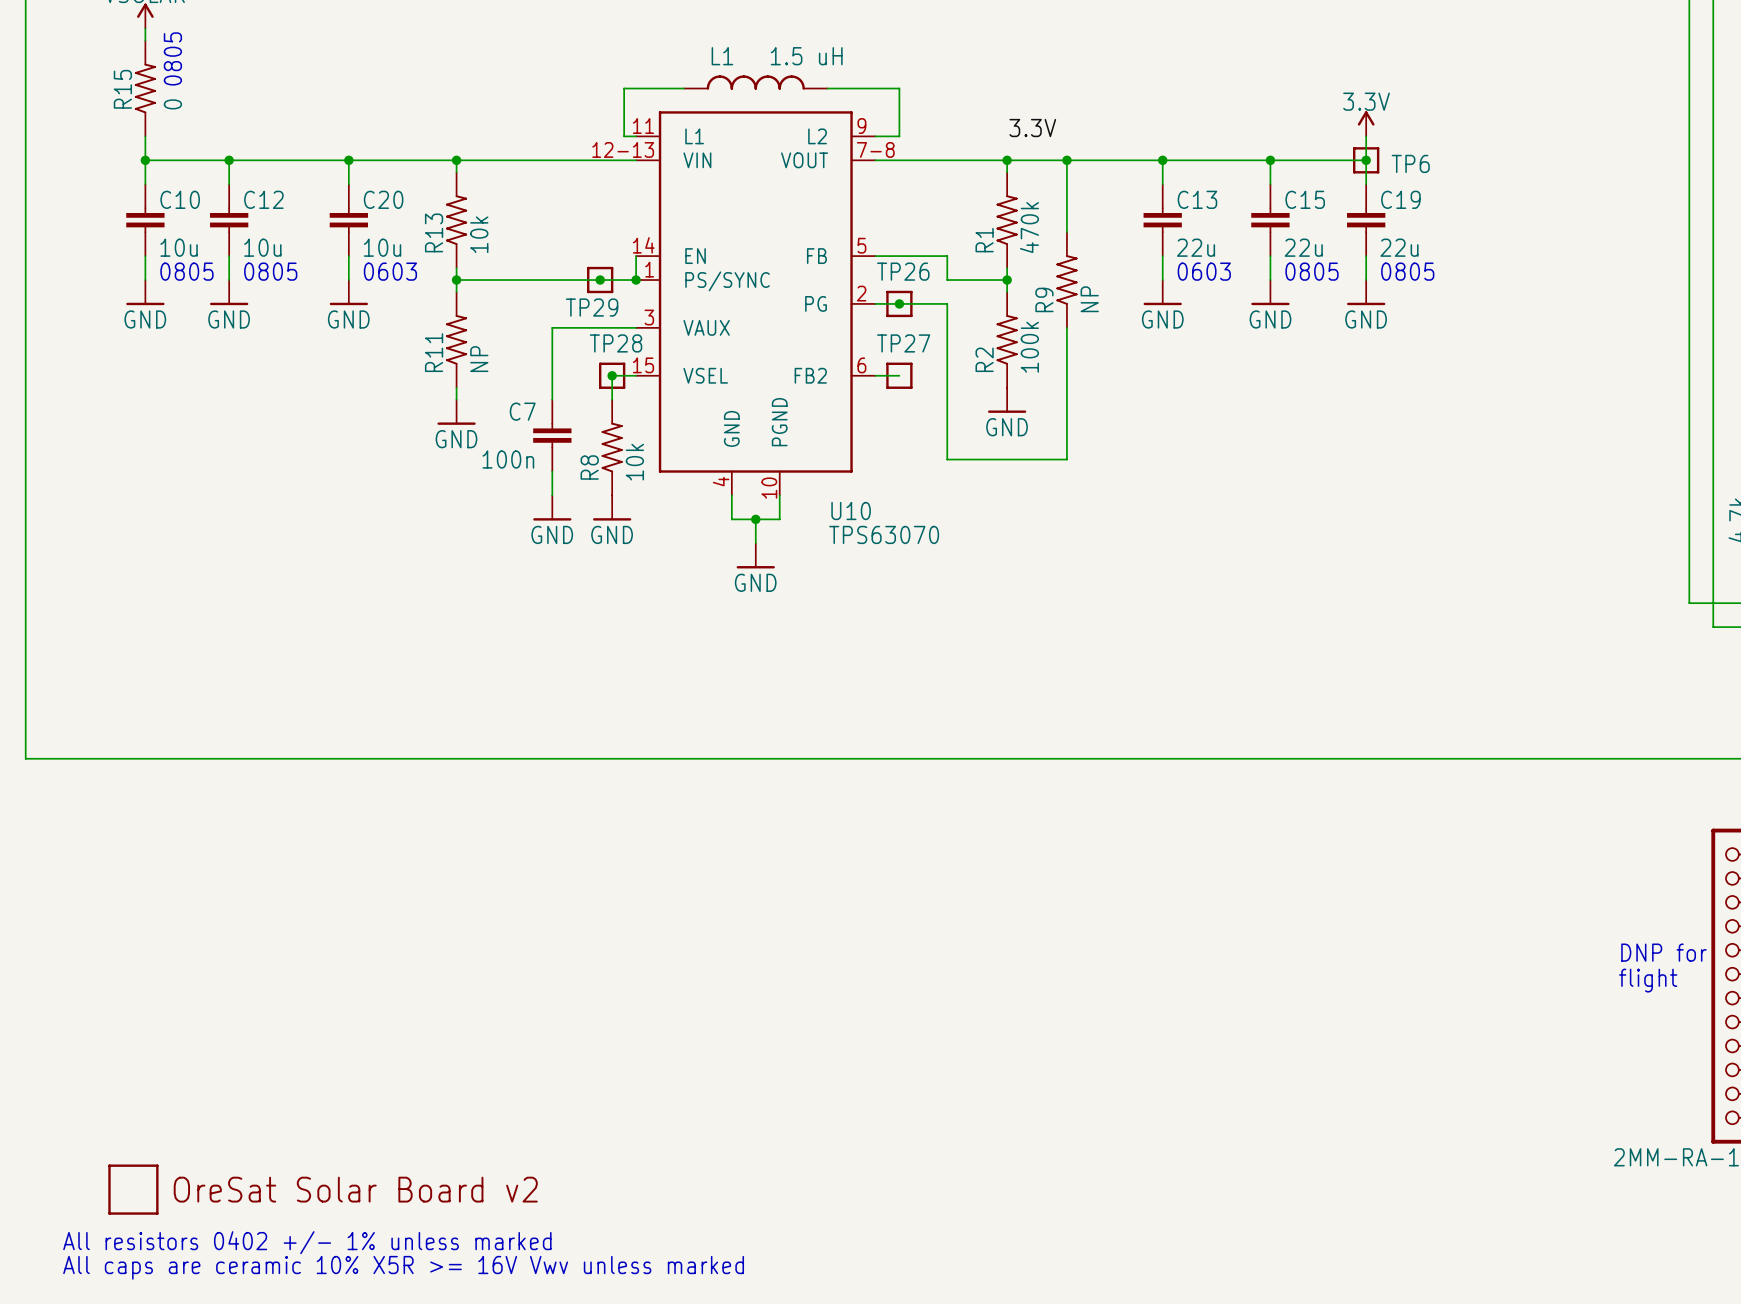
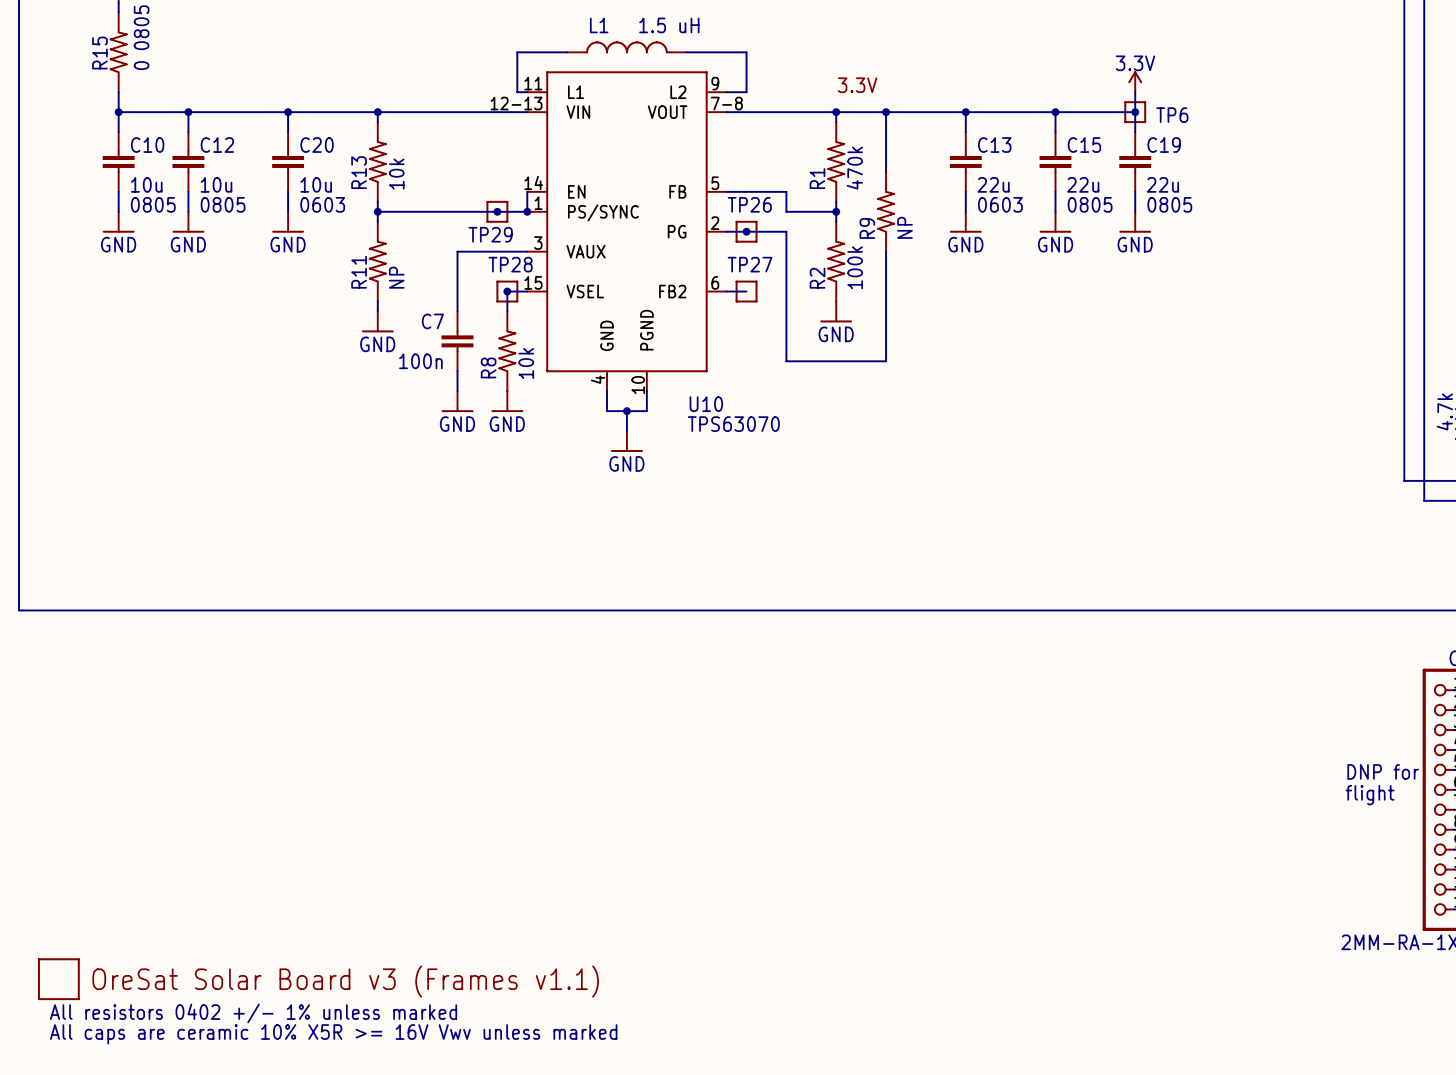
part: (133, 1189) -> none
part: none -> (58, 979)

